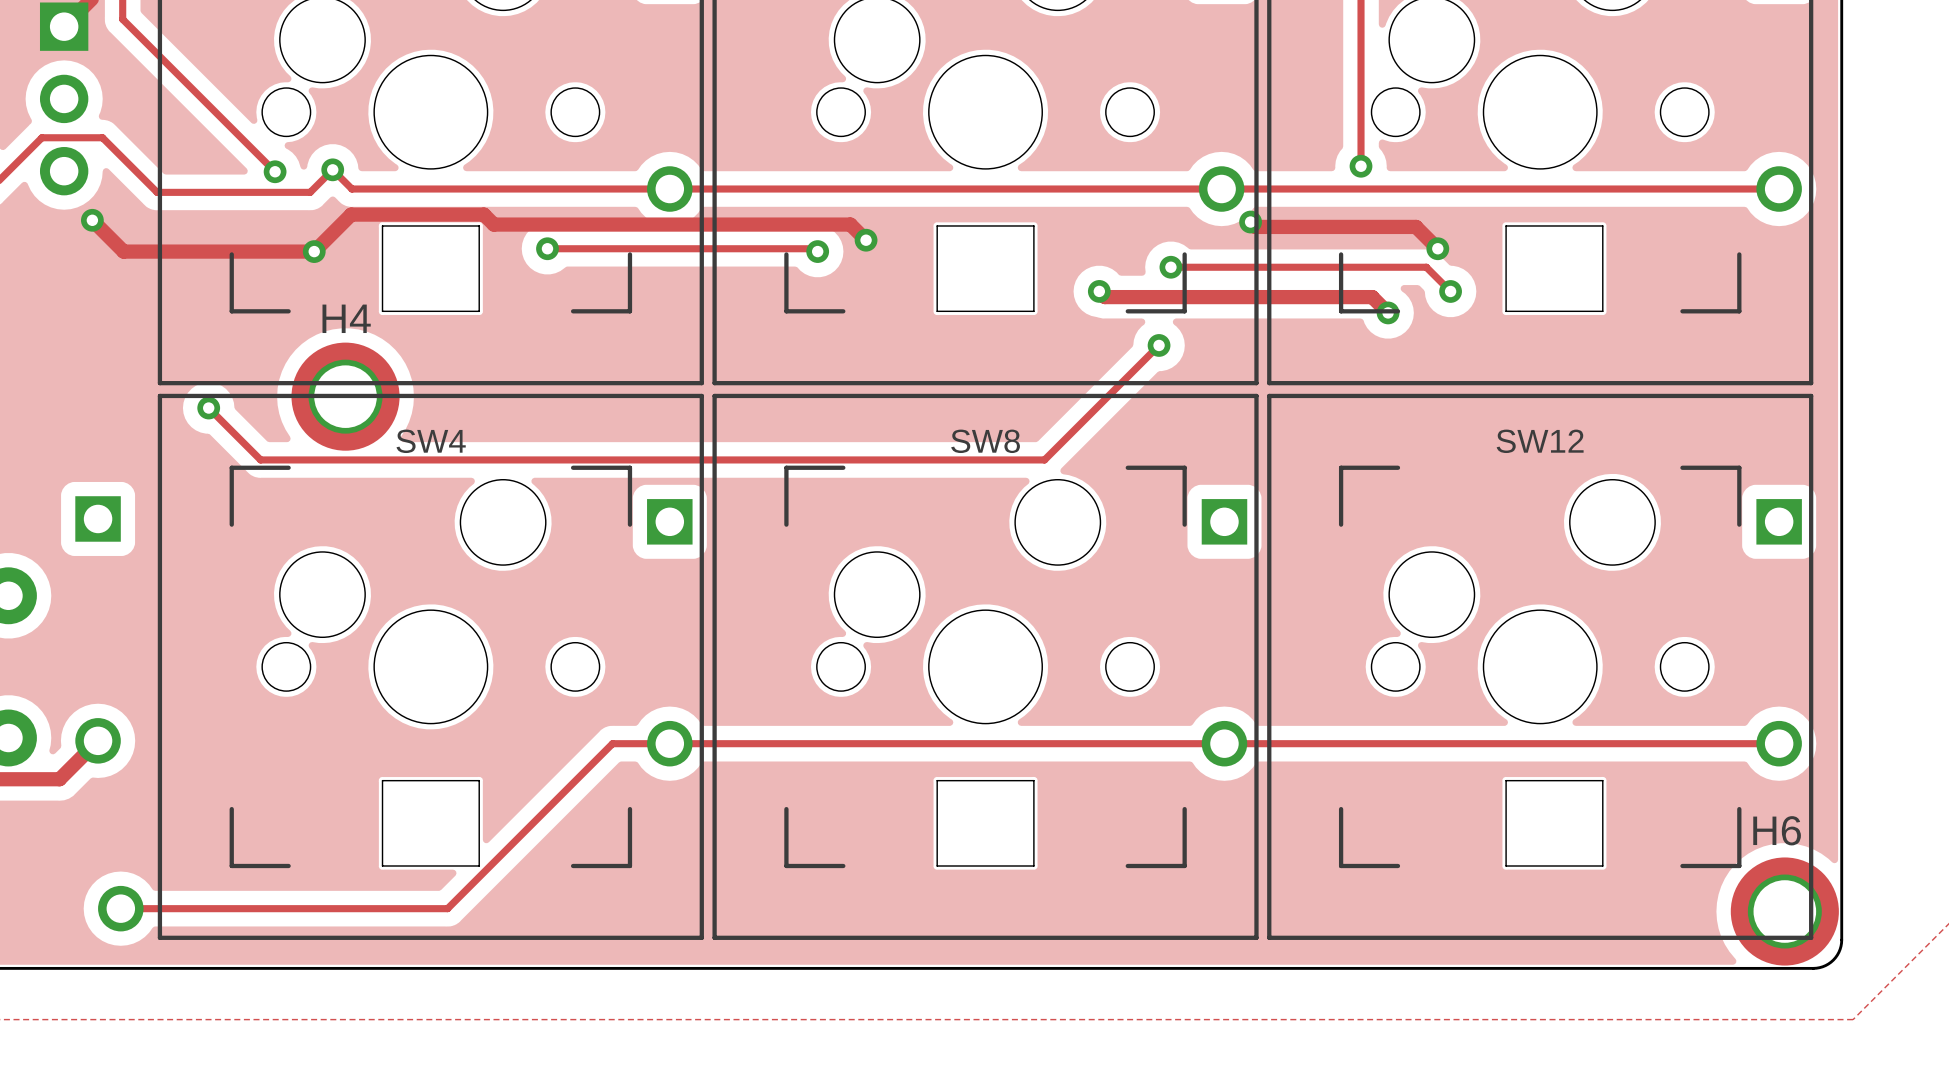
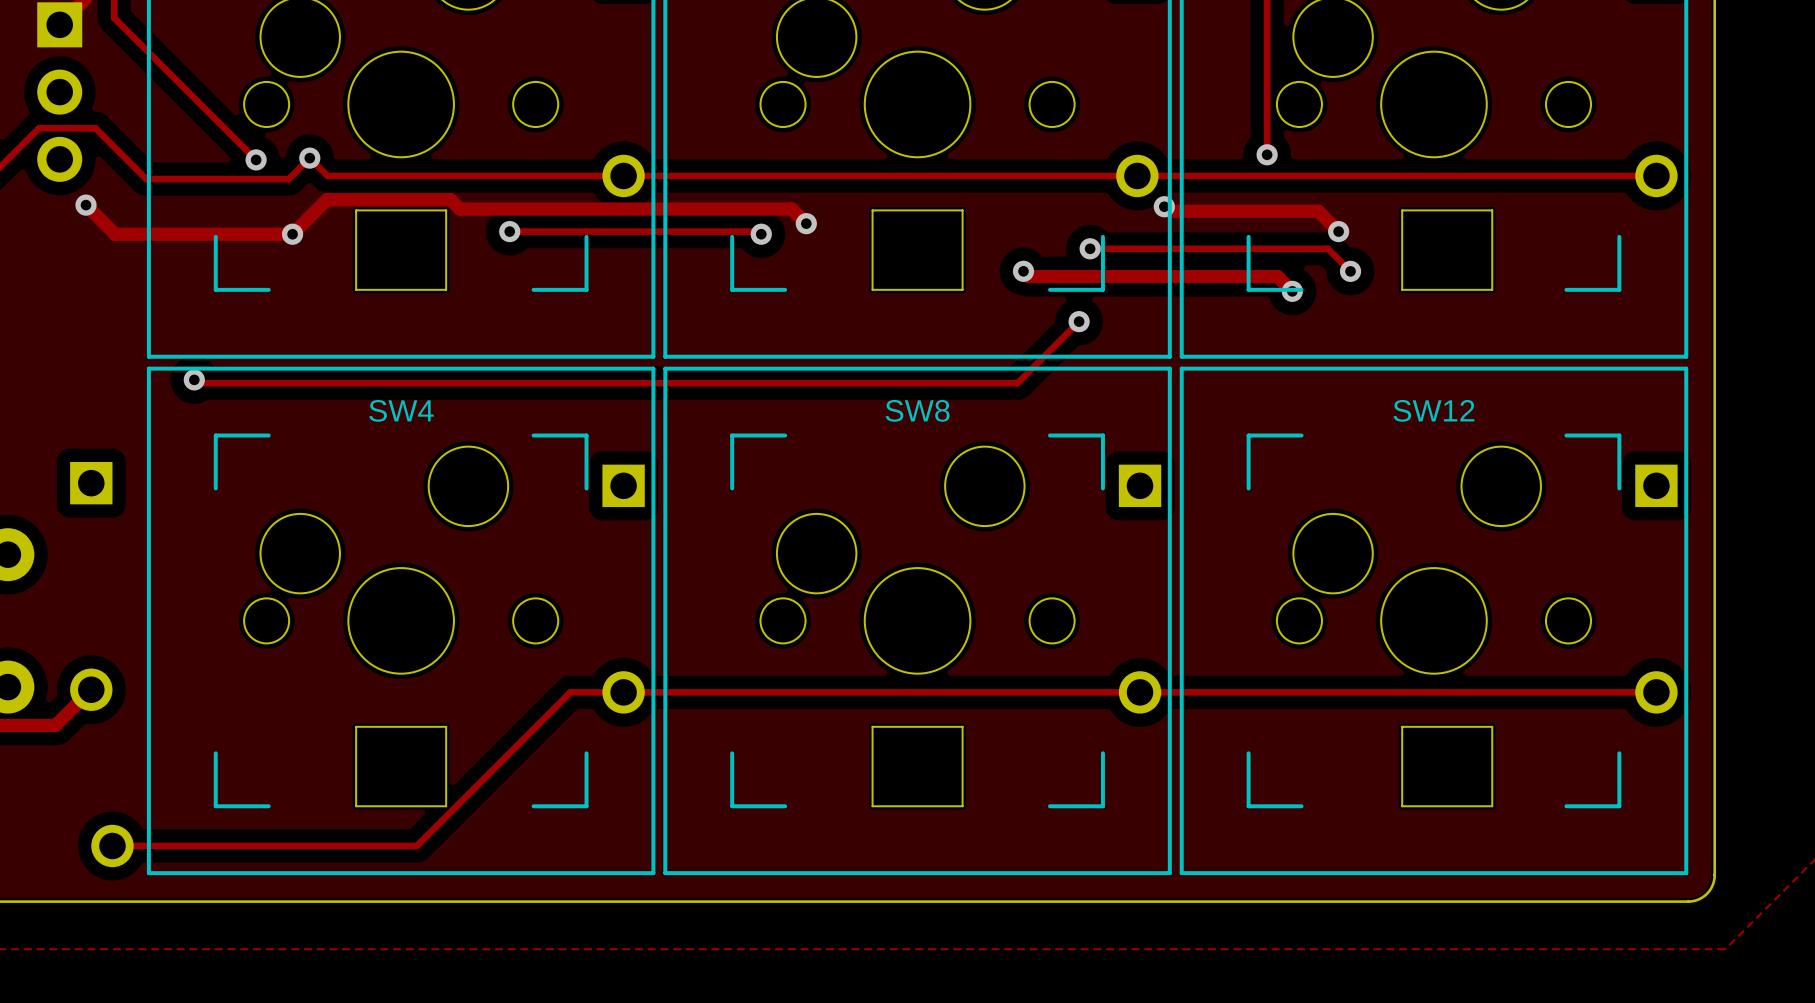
H4: (345, 396) -> none
track: (208, 408) (260, 459) (1044, 459) (1092, 411) -> (197, 383) (1017, 383)
H6: (1784, 911) -> none

